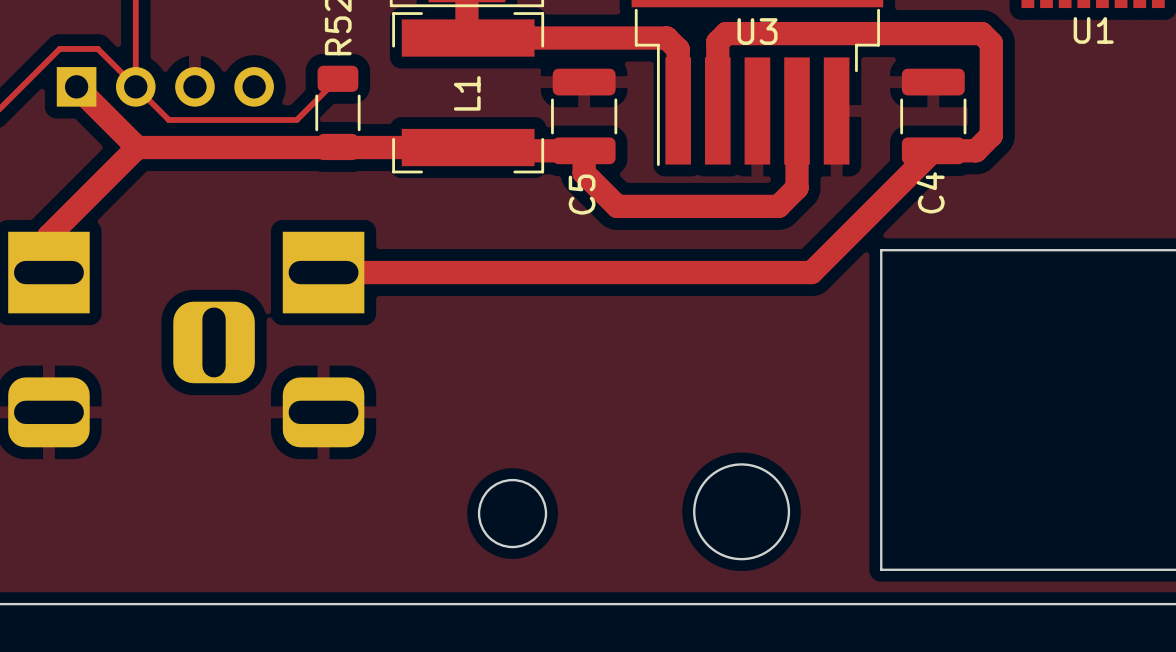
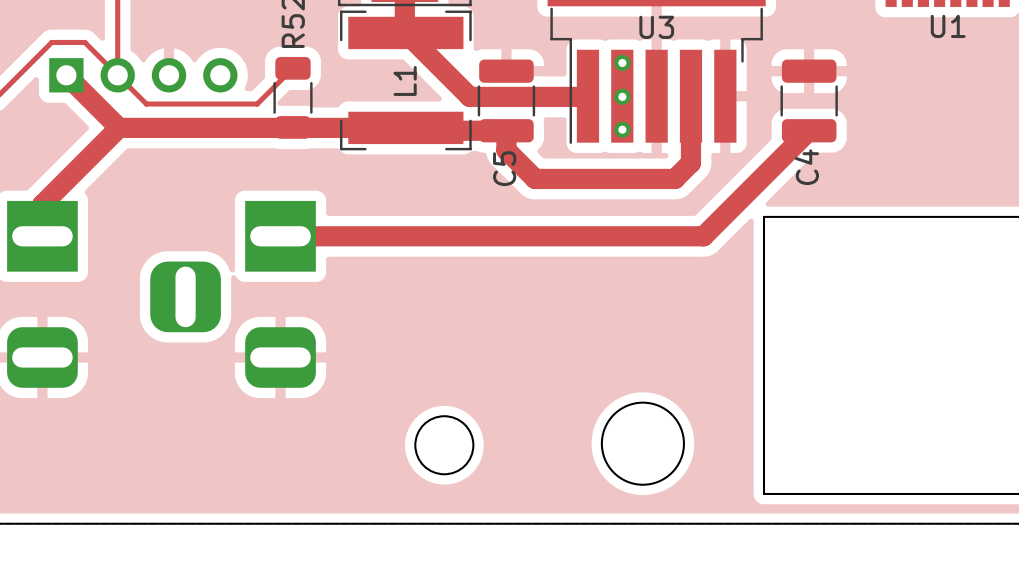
track: (468, 38) (666, 38) (678, 49) (678, 110) -> (405, 32) (469, 96) (587, 96)
via: none -> (622, 62)
track: (717, 110) (717, 41) (726, 33) (981, 33) (991, 43) (991, 135) (975, 150) (933, 150) -> none
via: none -> (622, 96)
via: none -> (622, 129)

